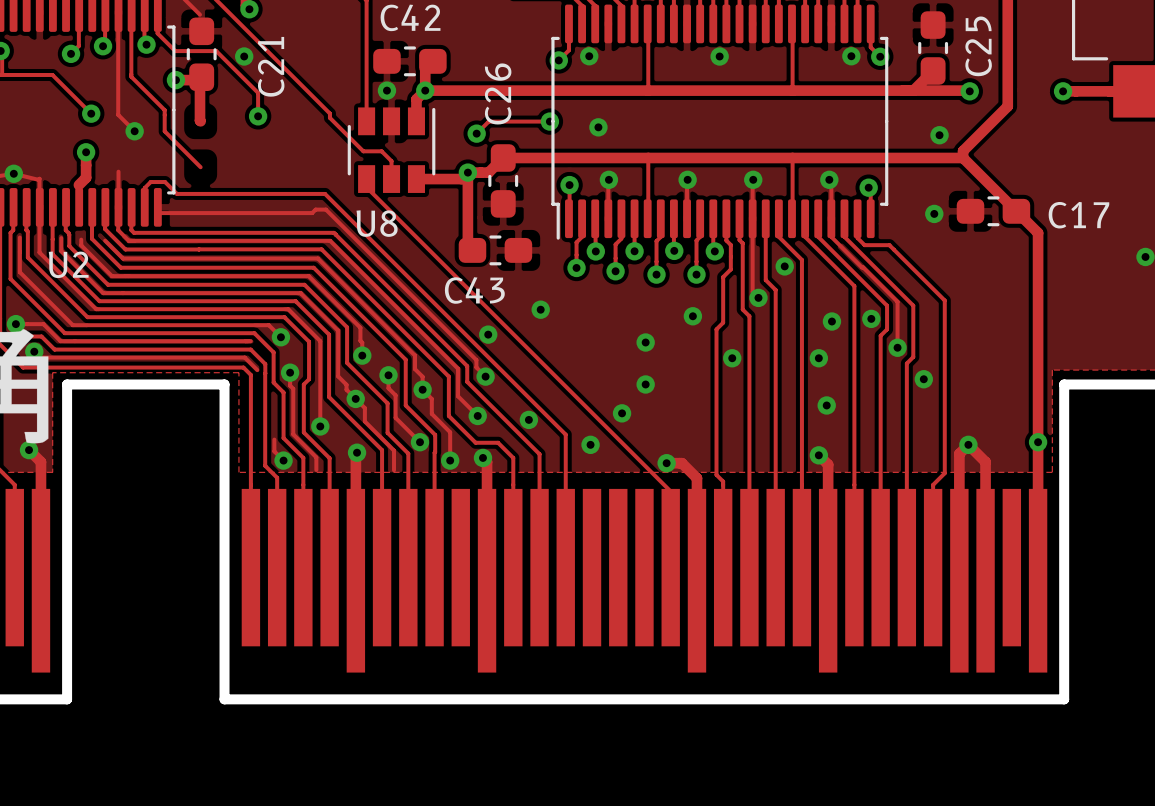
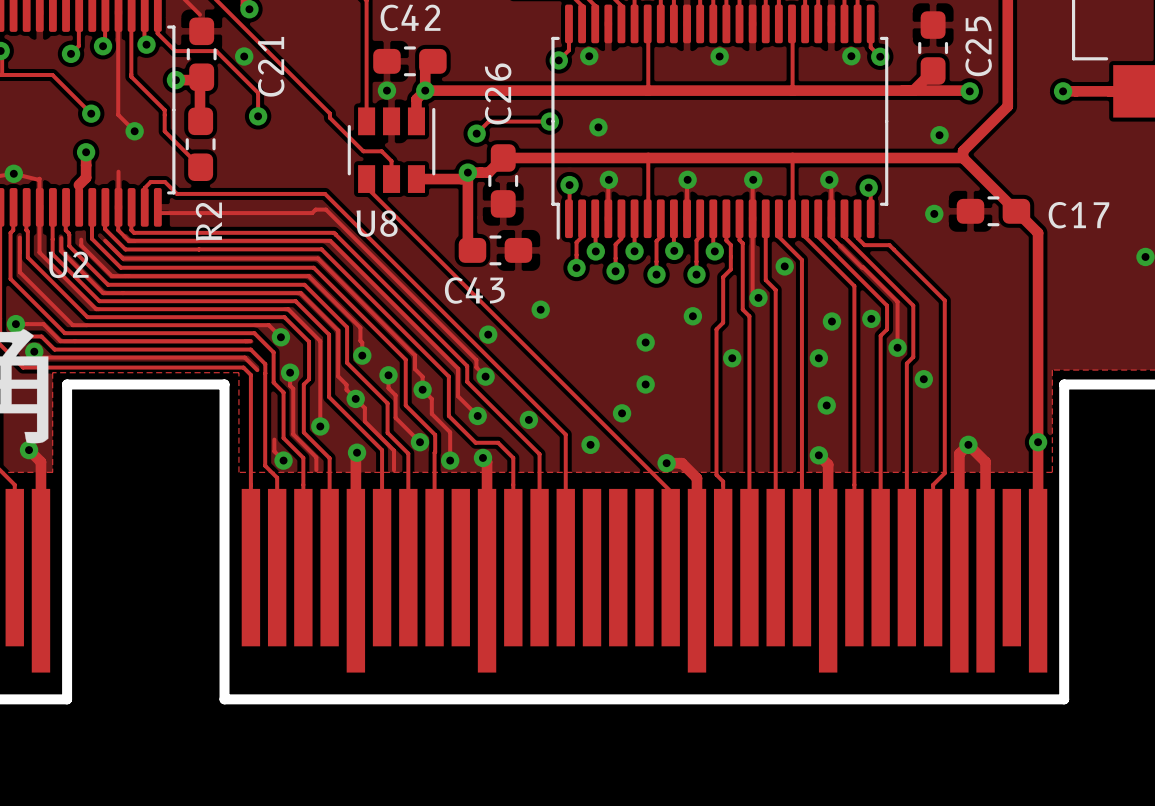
R2: none -> (200, 144)

